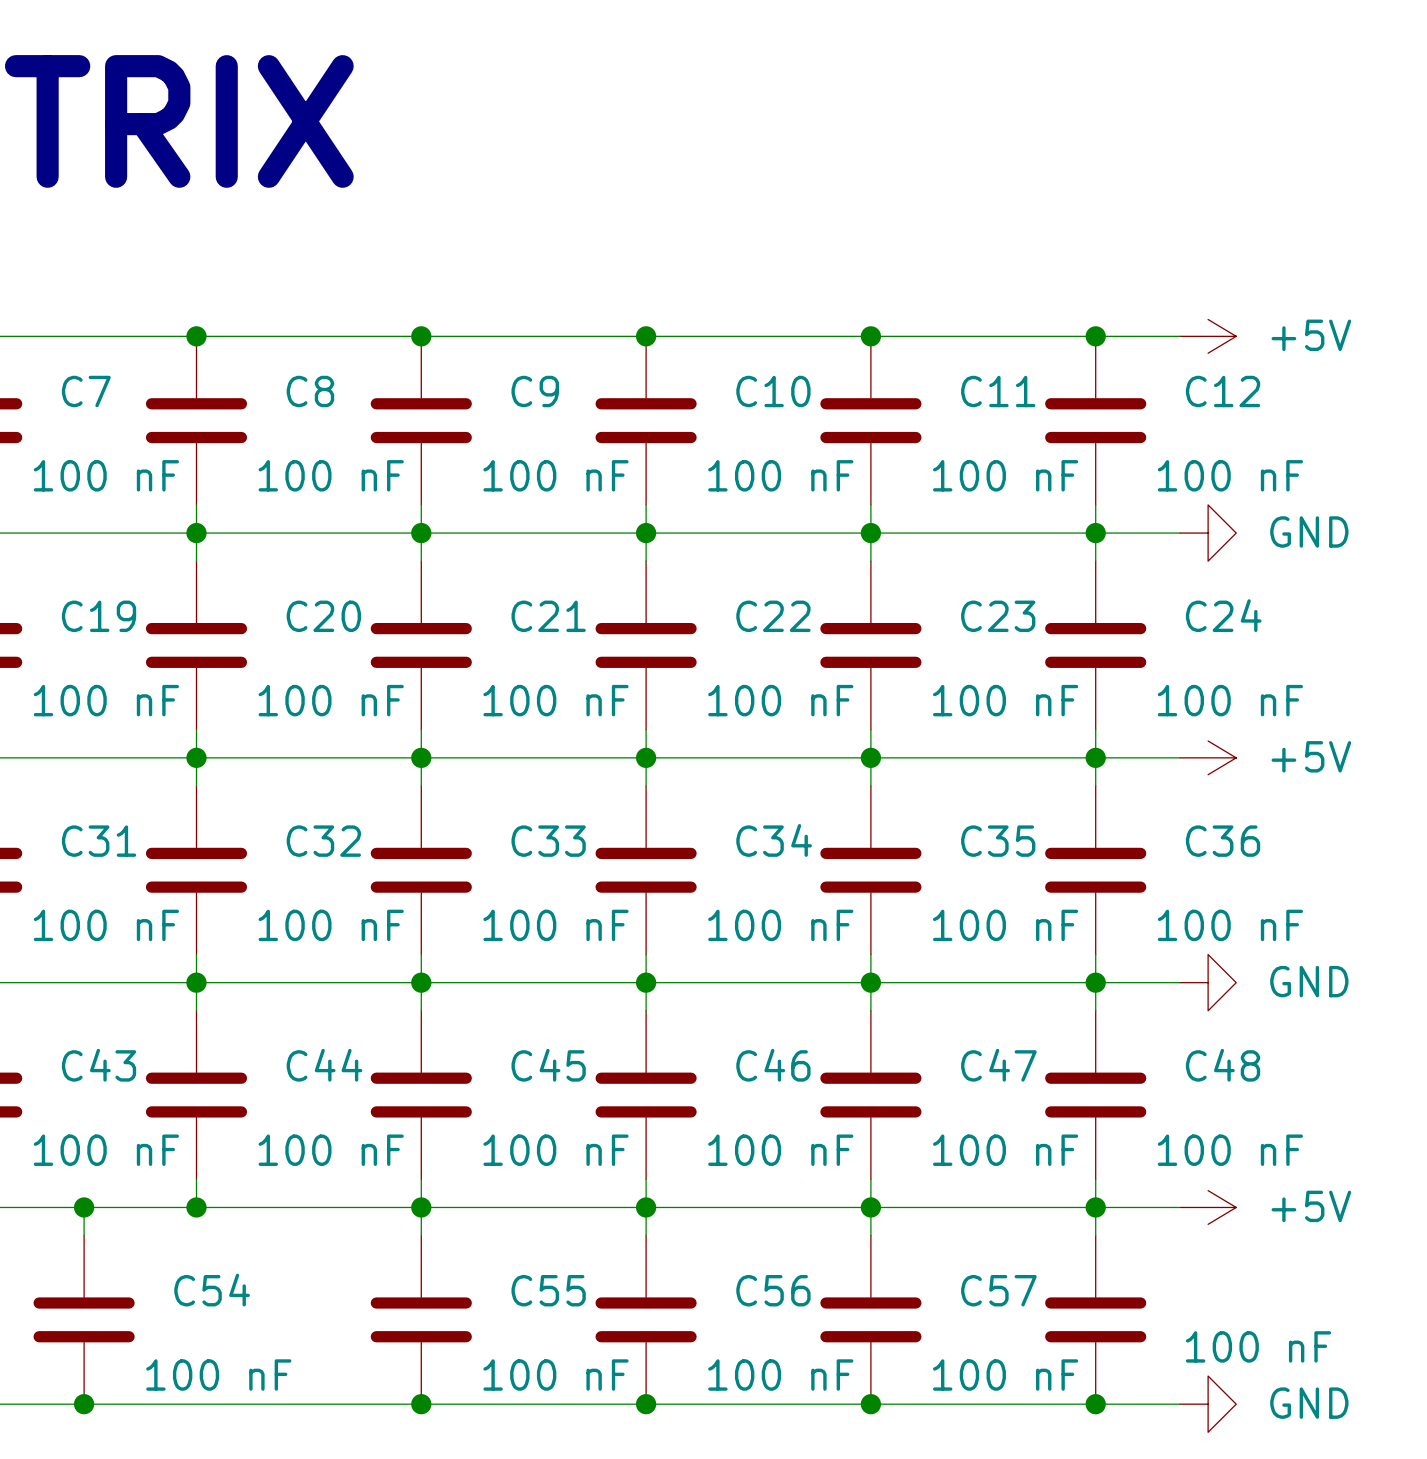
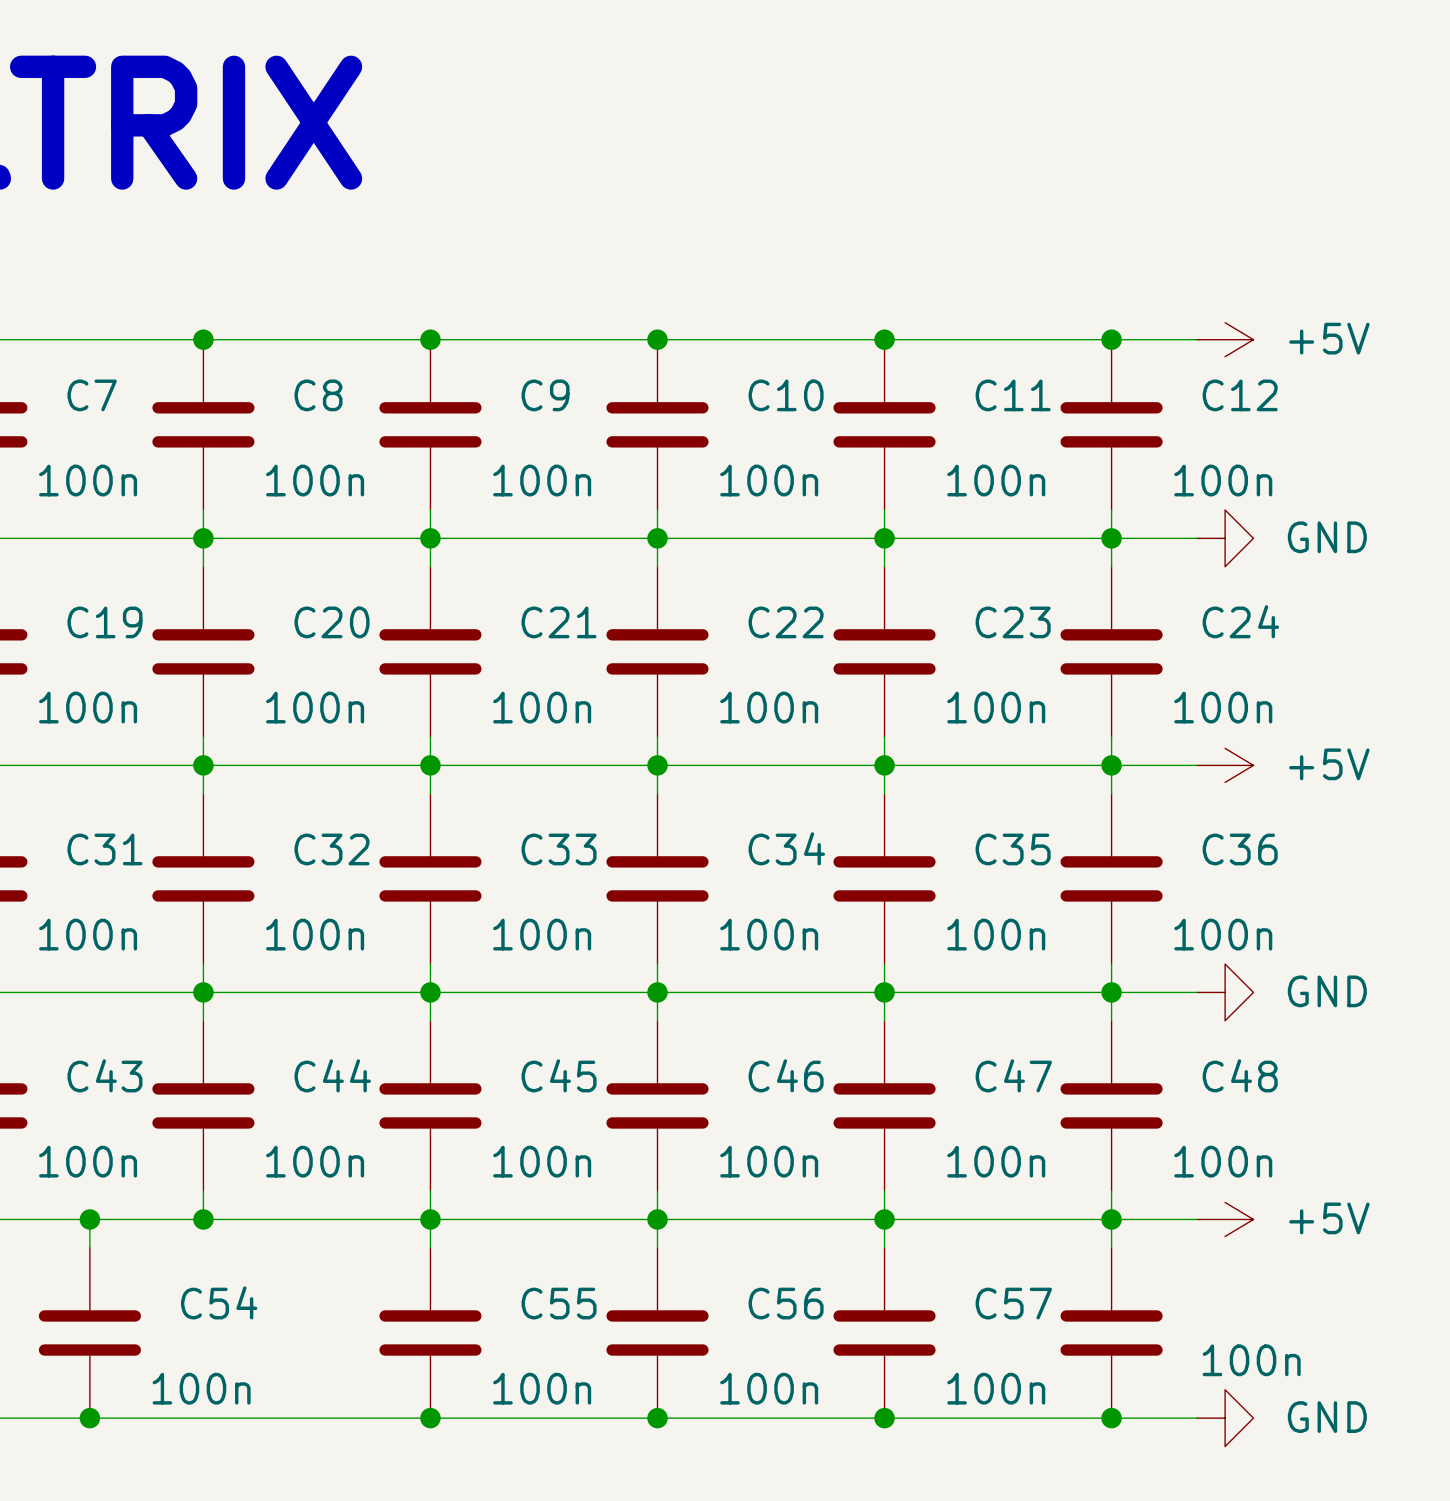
C7 value: 100 nF (106, 475) -> 100n (88, 480)
C8 value: 100 nF (331, 475) -> 100n (315, 480)
C9 value: 100 nF (555, 475) -> 100n (542, 480)
C10 value: 100 nF (780, 475) -> 100n (769, 480)
C11 value: 100 nF (1005, 475) -> 100n (996, 480)
C12 value: 100 nF (1230, 475) -> 100n (1223, 480)
C19 value: 100 nF (106, 700) -> 100n (88, 707)
C20 value: 100 nF (331, 700) -> 100n (315, 707)
C21 value: 100 nF (555, 700) -> 100n (542, 707)
C22 value: 100 nF (780, 700) -> 100n (769, 707)
C23 value: 100 nF (1005, 700) -> 100n (996, 707)
C24 value: 100 nF (1230, 700) -> 100n (1223, 707)
C31 value: 100 nF (106, 925) -> 100n (88, 934)
C32 value: 100 nF (331, 925) -> 100n (315, 934)
C33 value: 100 nF (555, 925) -> 100n (542, 934)
C34 value: 100 nF (780, 925) -> 100n (769, 934)
C35 value: 100 nF (1005, 925) -> 100n (996, 934)
C36 value: 100 nF (1230, 925) -> 100n (1223, 934)
C43 value: 100 nF (106, 1150) -> 100n (88, 1161)
C44 value: 100 nF (331, 1150) -> 100n (315, 1161)
C45 value: 100 nF (555, 1150) -> 100n (542, 1161)
C46 value: 100 nF (780, 1150) -> 100n (769, 1161)
C47 value: 100 nF (1005, 1150) -> 100n (996, 1161)
C48 value: 100 nF (1230, 1150) -> 100n (1223, 1161)
part value: 100 nF (1258, 1346) -> 100n (1251, 1360)
C54 value: 100 nF (218, 1375) -> 100n (201, 1388)
C55 value: 100 nF (555, 1375) -> 100n (542, 1388)
C56 value: 100 nF (780, 1375) -> 100n (769, 1388)
C57 value: 100 nF (1005, 1375) -> 100n (996, 1388)

